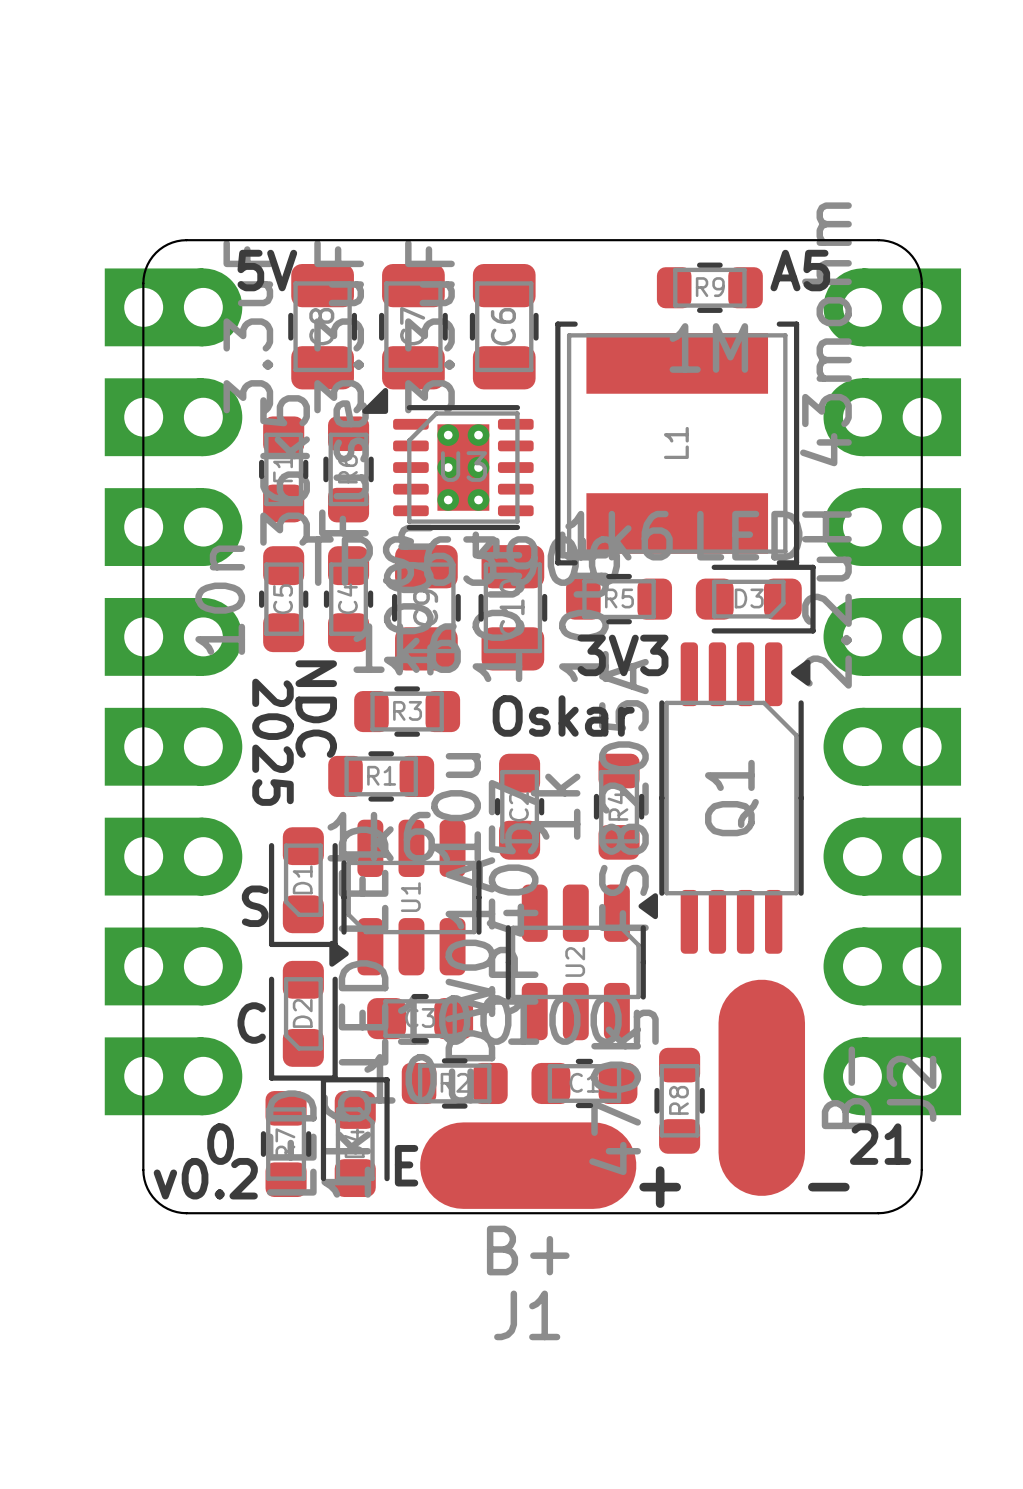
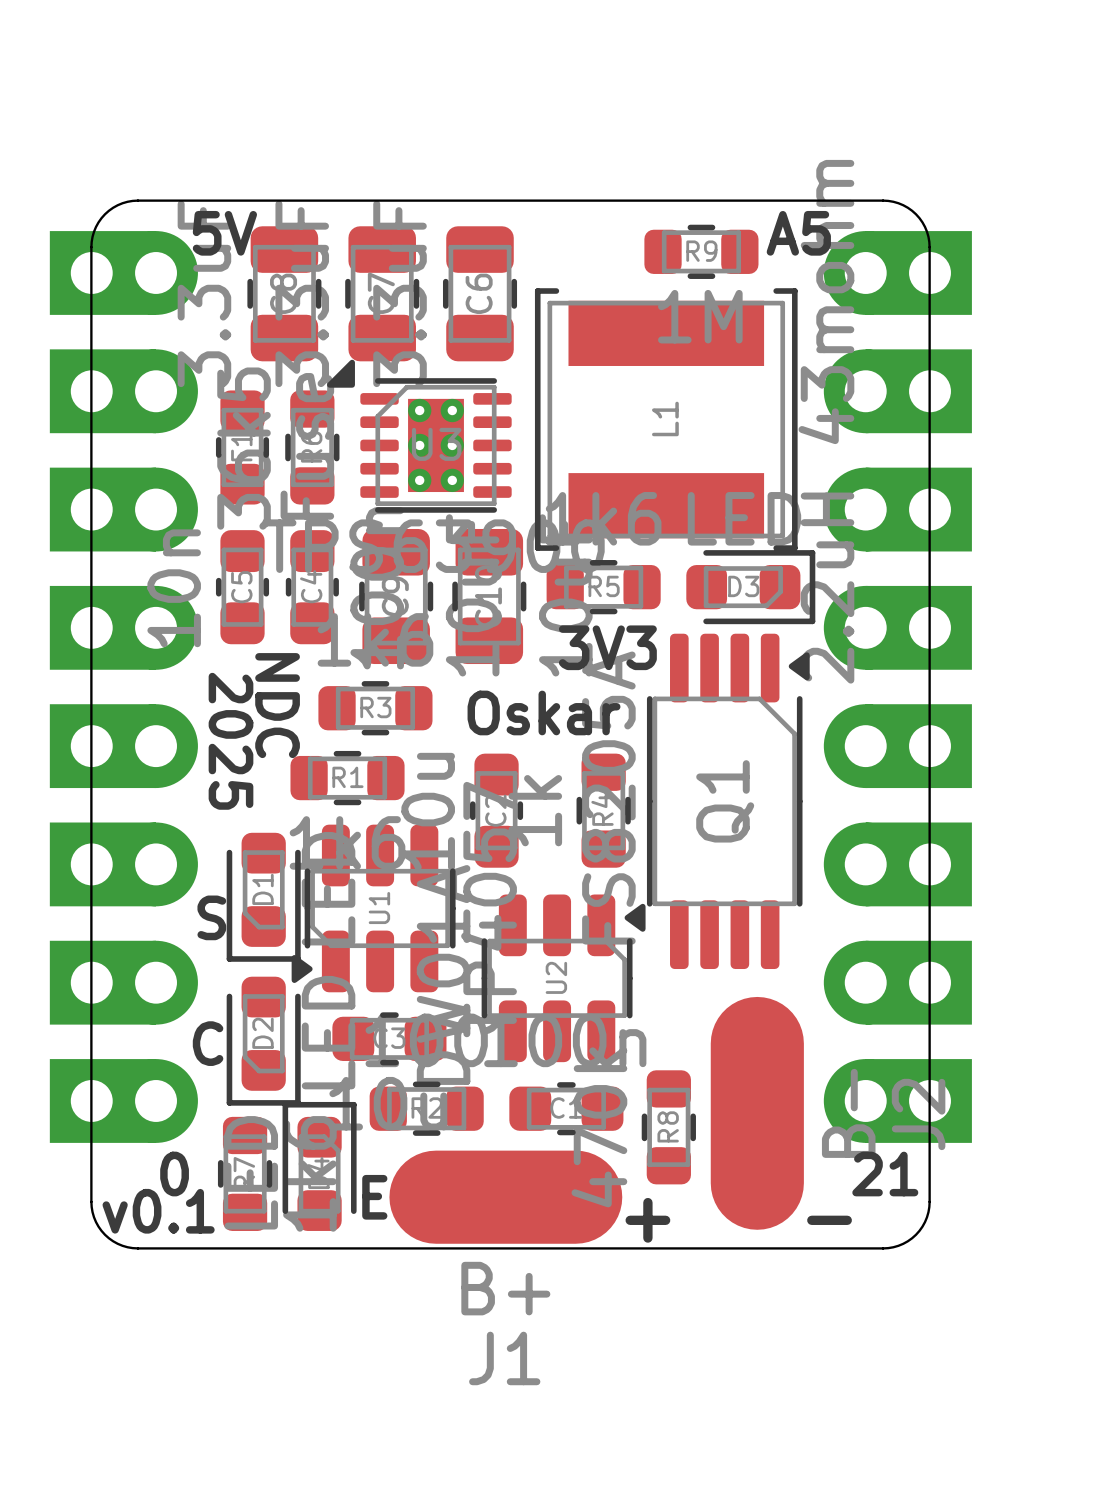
text: v0.2 (205, 1178) -> v0.1 (158, 1211)

